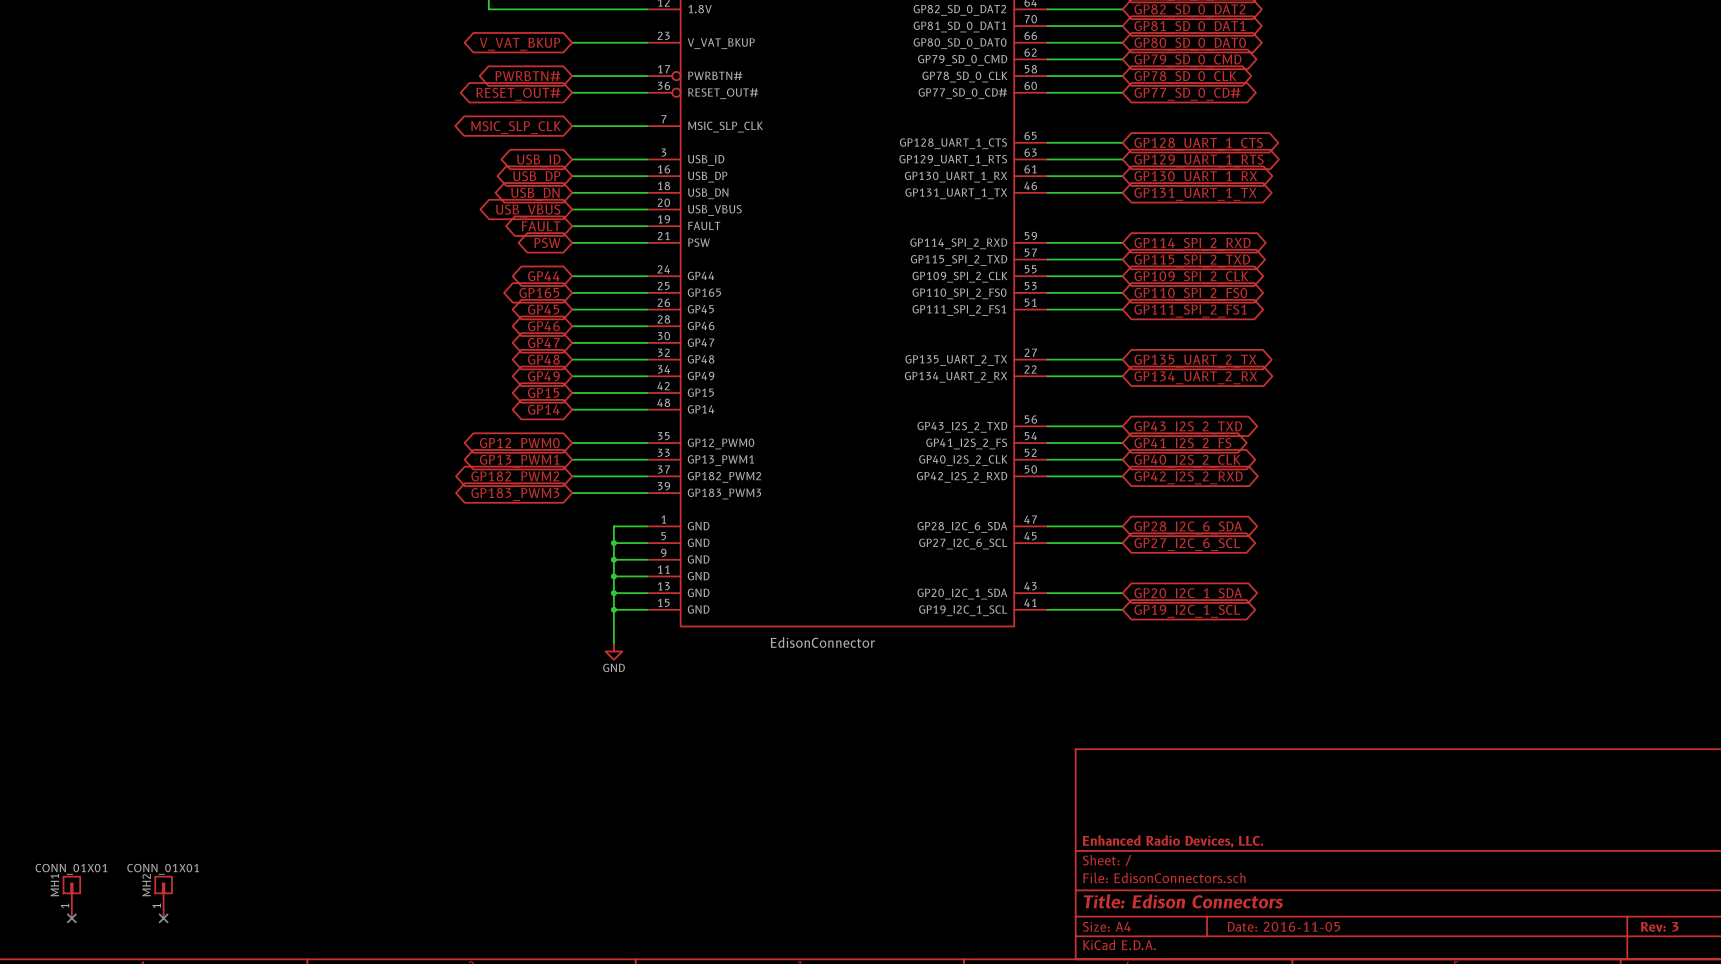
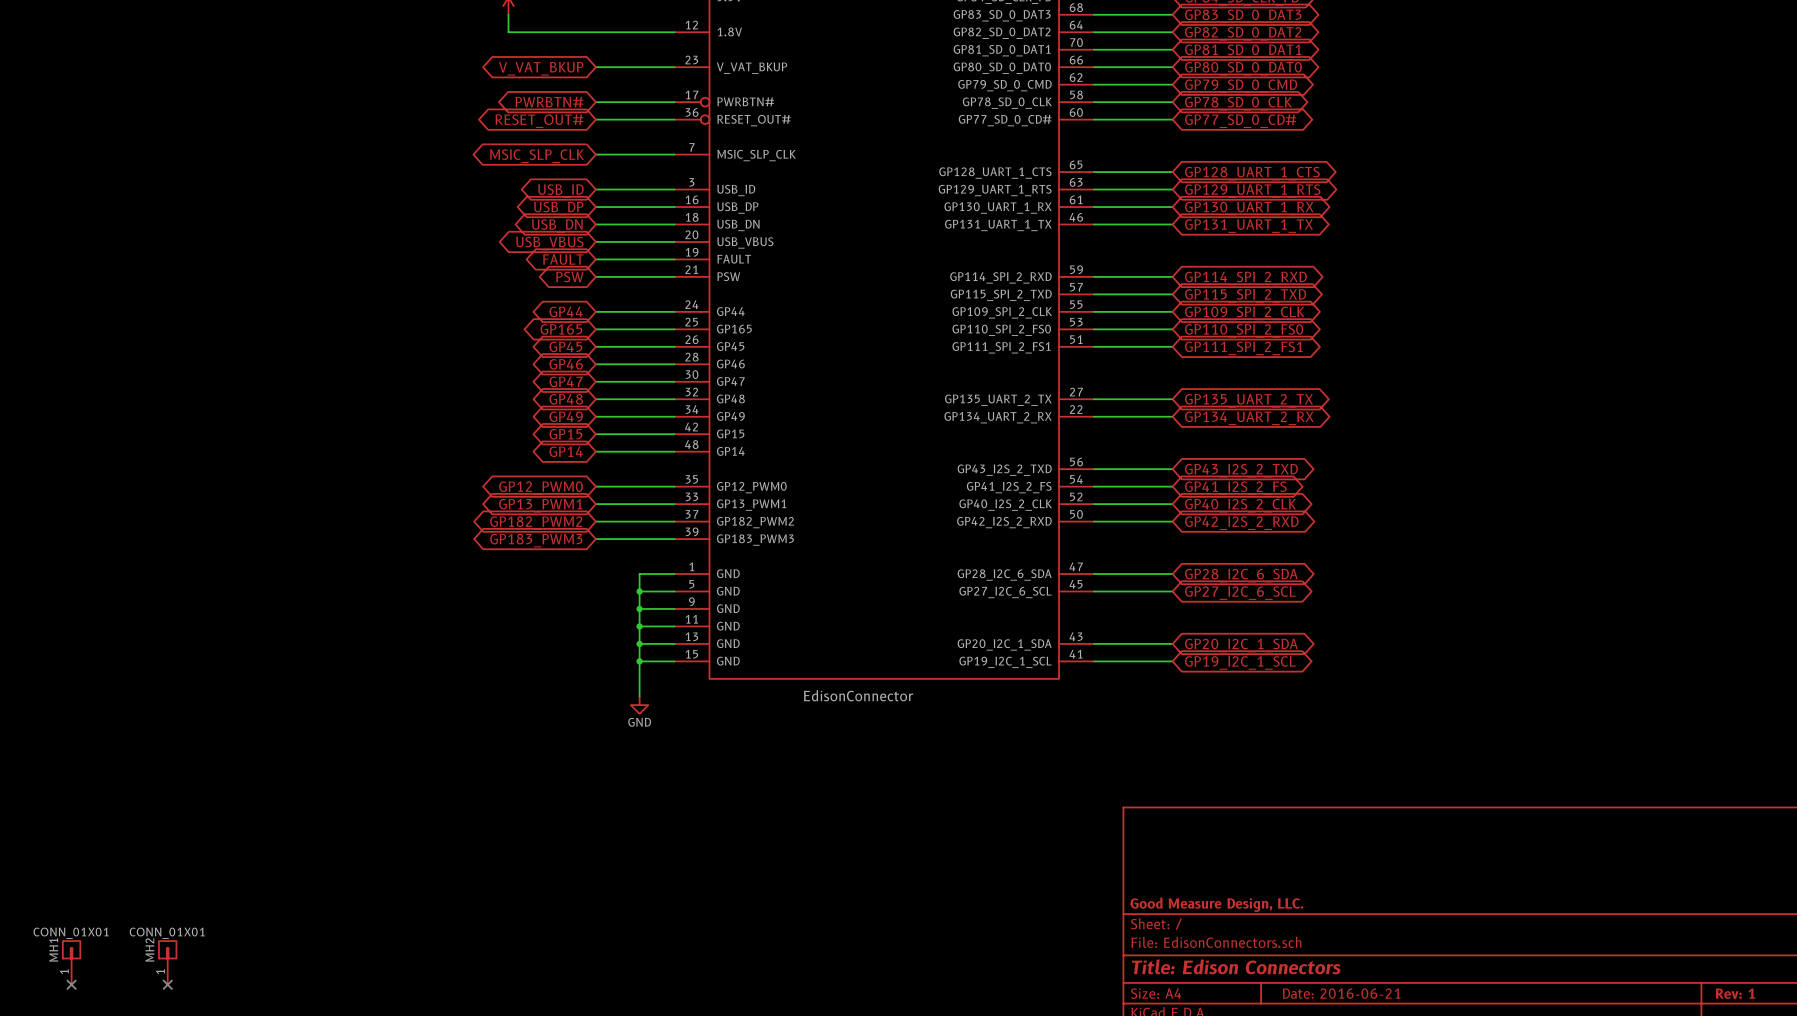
title block: Enhanced Radio Devices, LLC. (1172, 841) -> Good Measure Design, LLC. (1216, 904)
title block: Date: 2016-11-05 (1283, 926) -> Date: 2016-06-21 (1341, 993)
title block: Rev: 3 (1659, 926) -> Rev: 1 (1735, 993)

